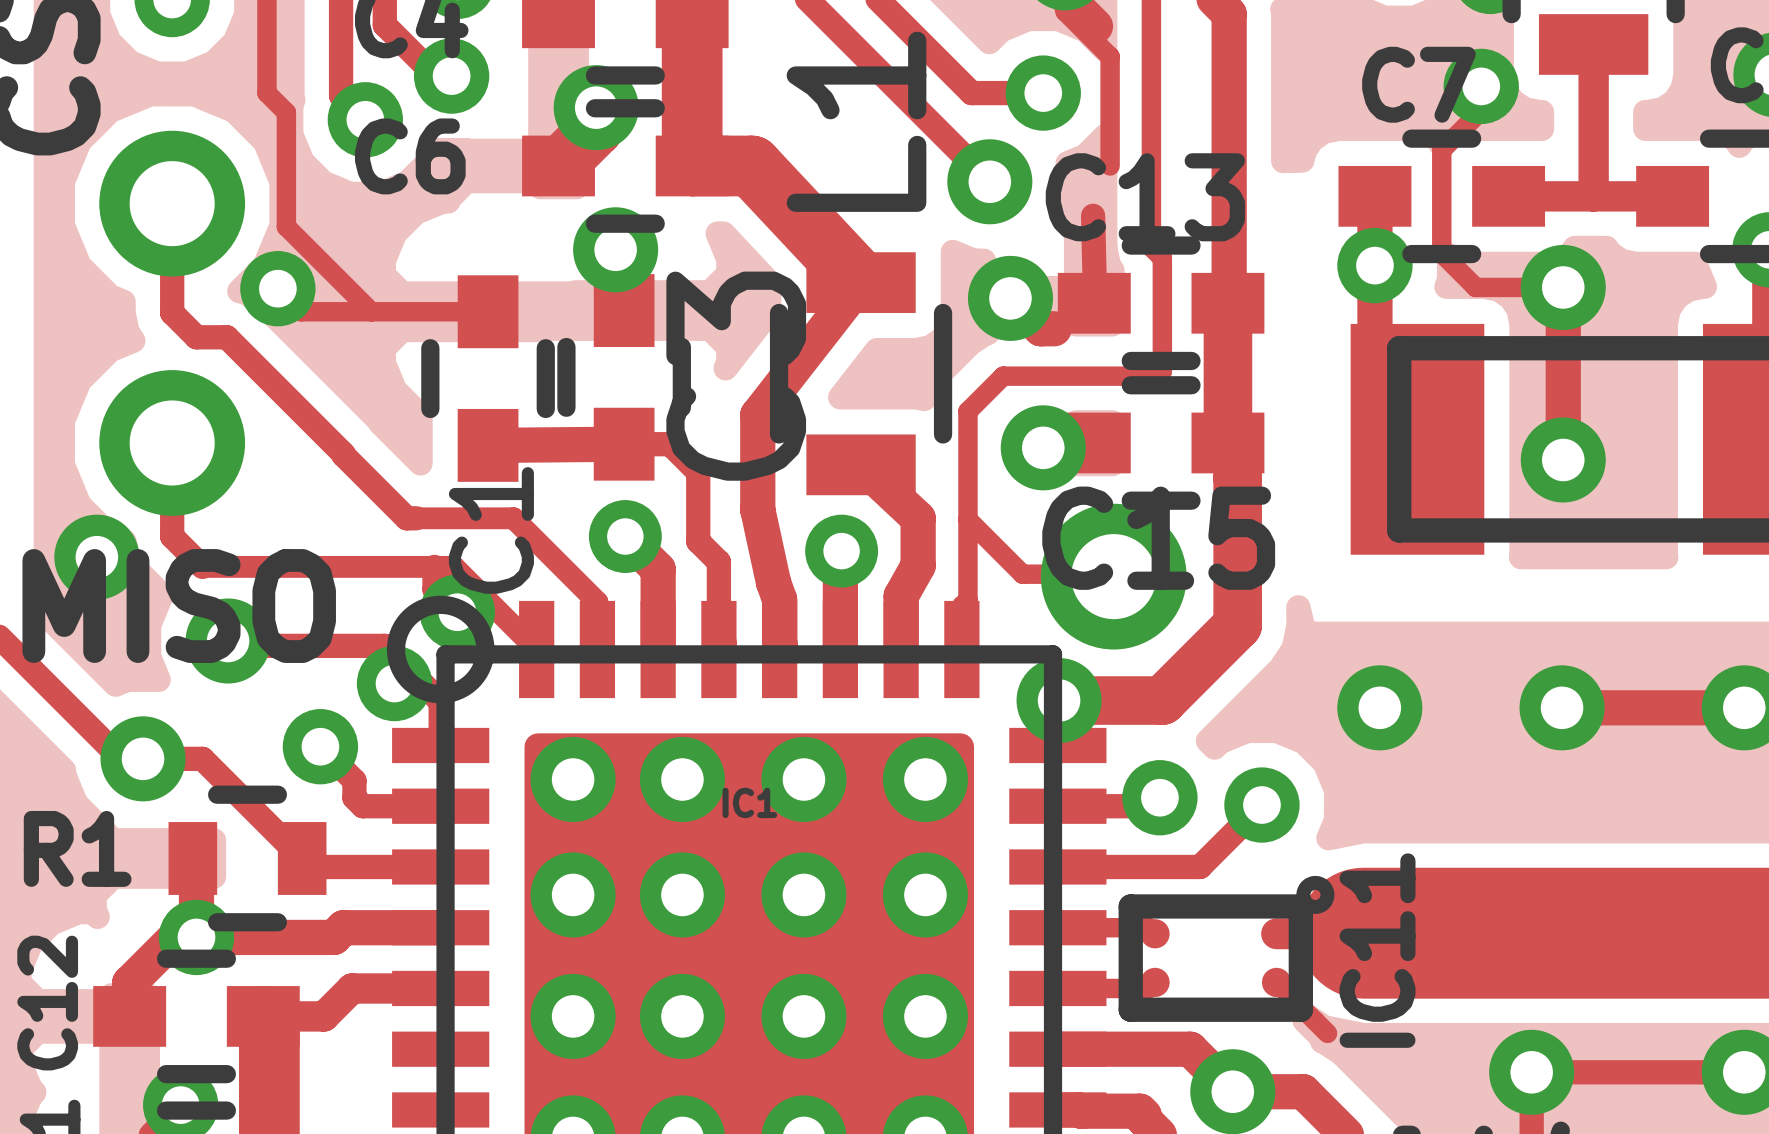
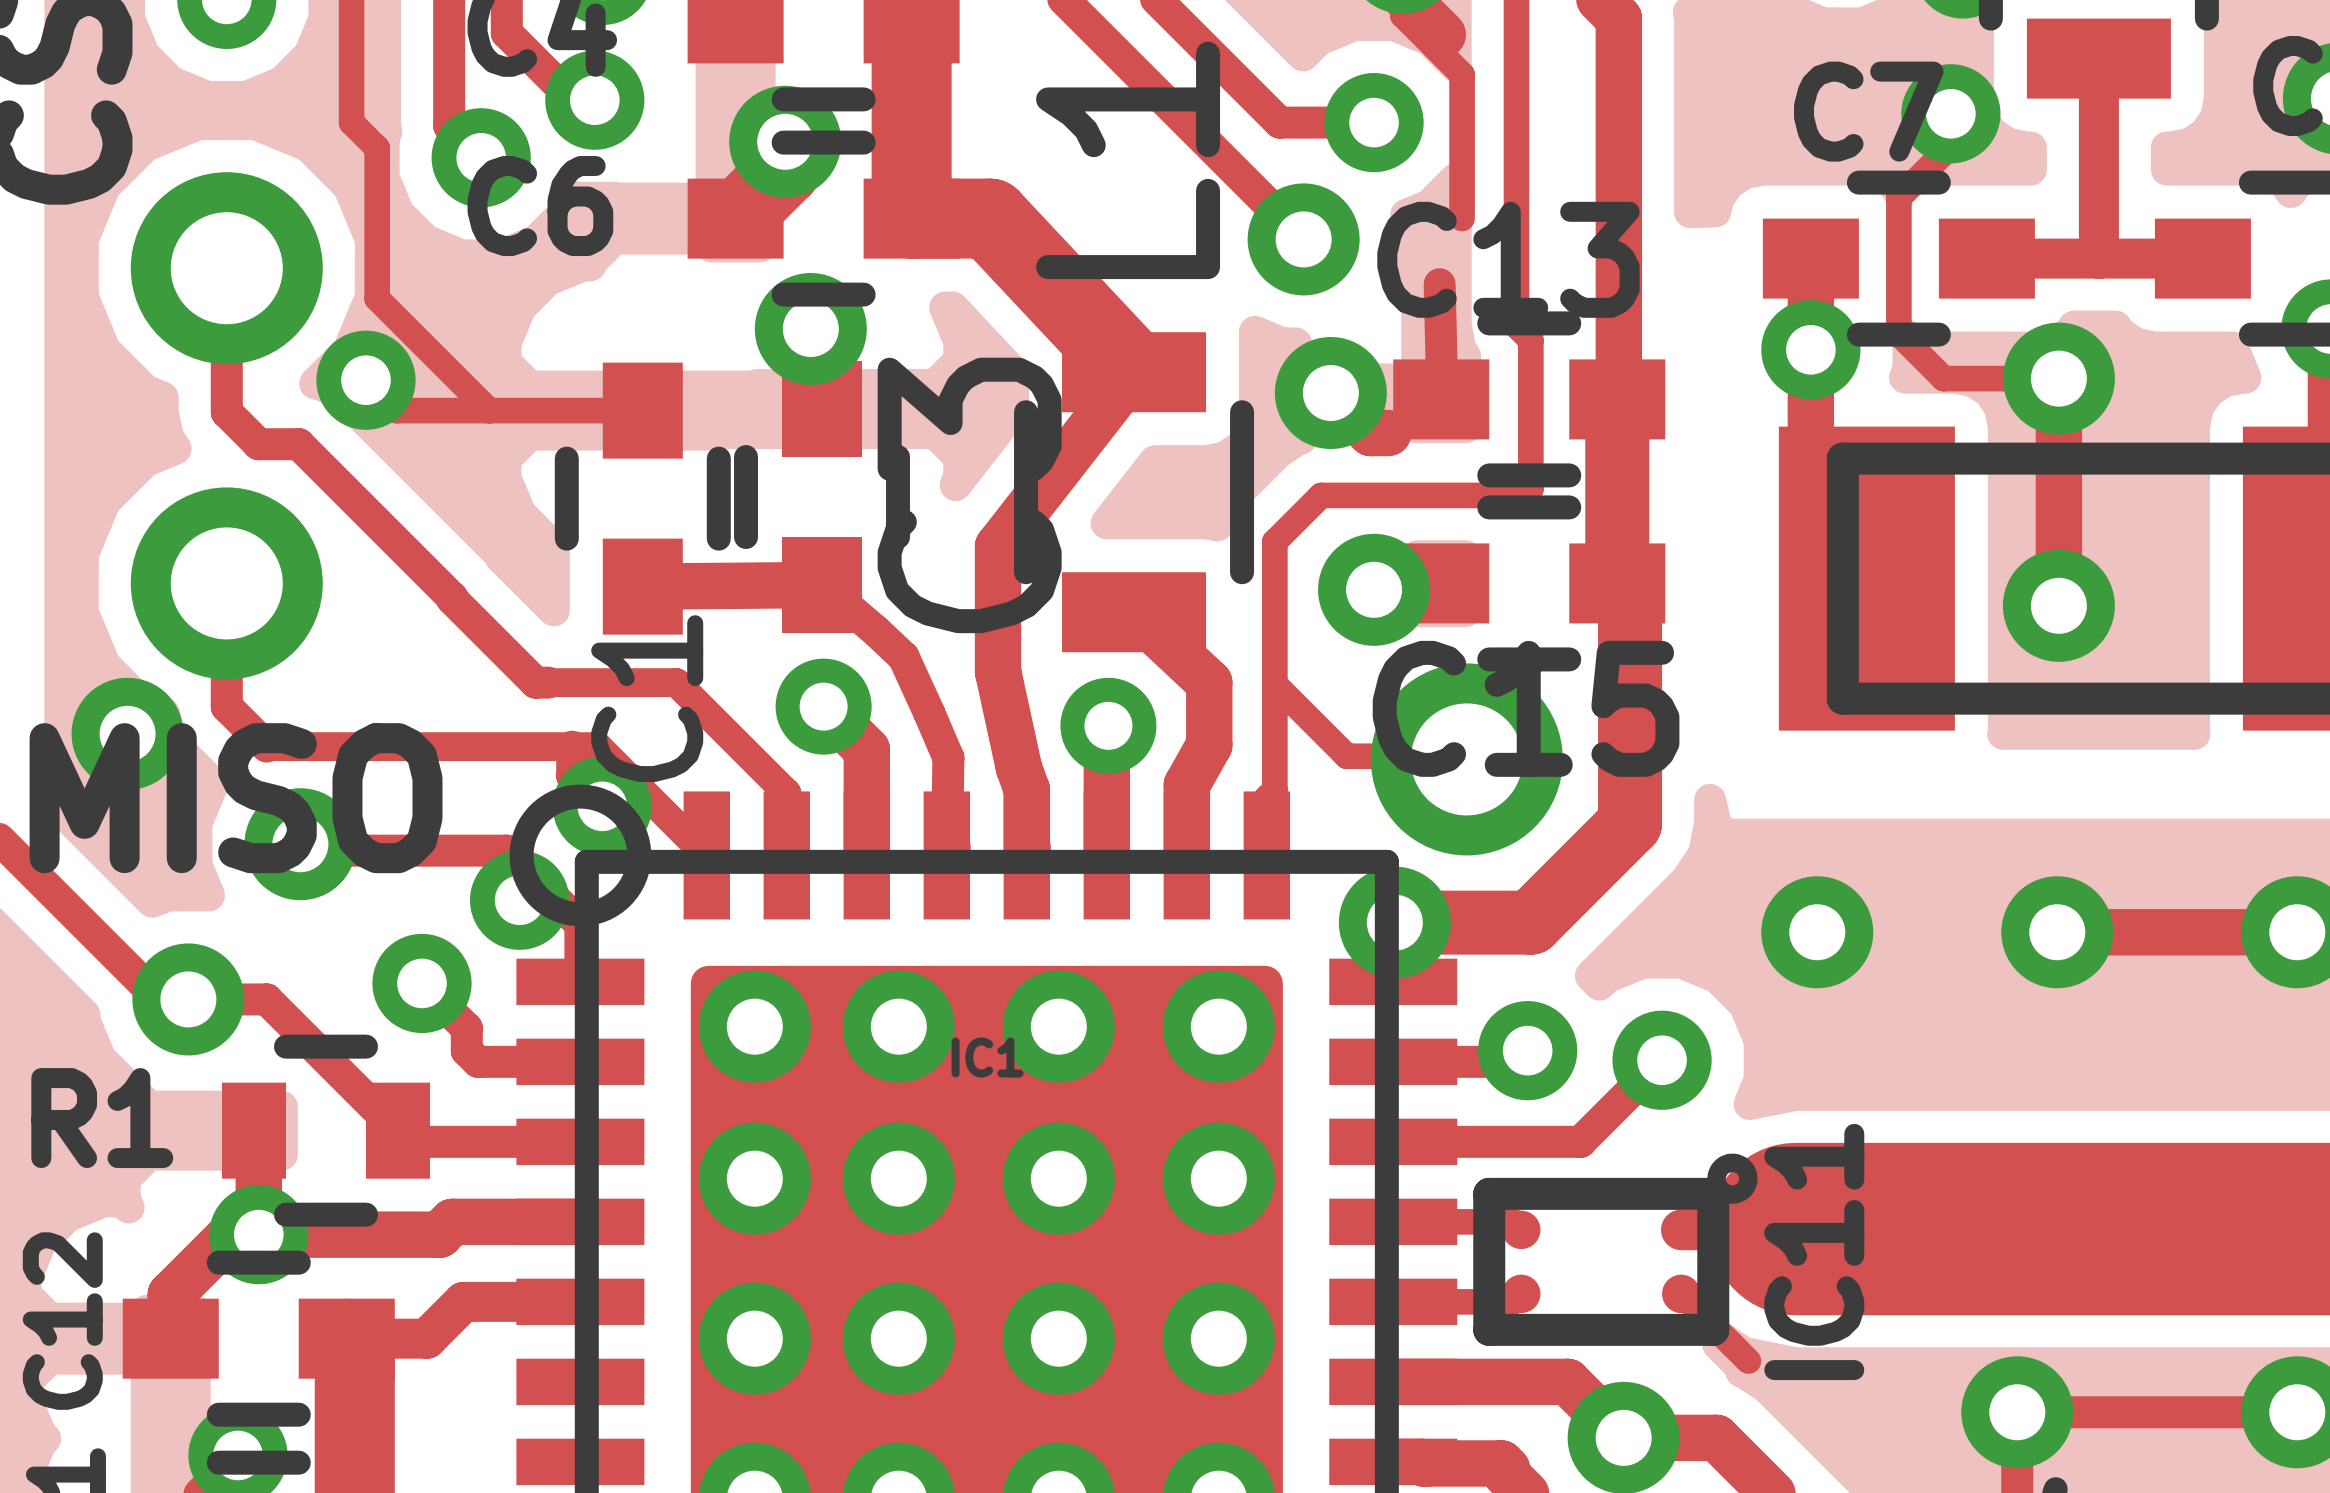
track: (624, 444) (670, 444) (698, 472) (698, 541) (718, 562) (718, 649) -> (822, 585) (903, 657) (948, 757) (946, 855)

